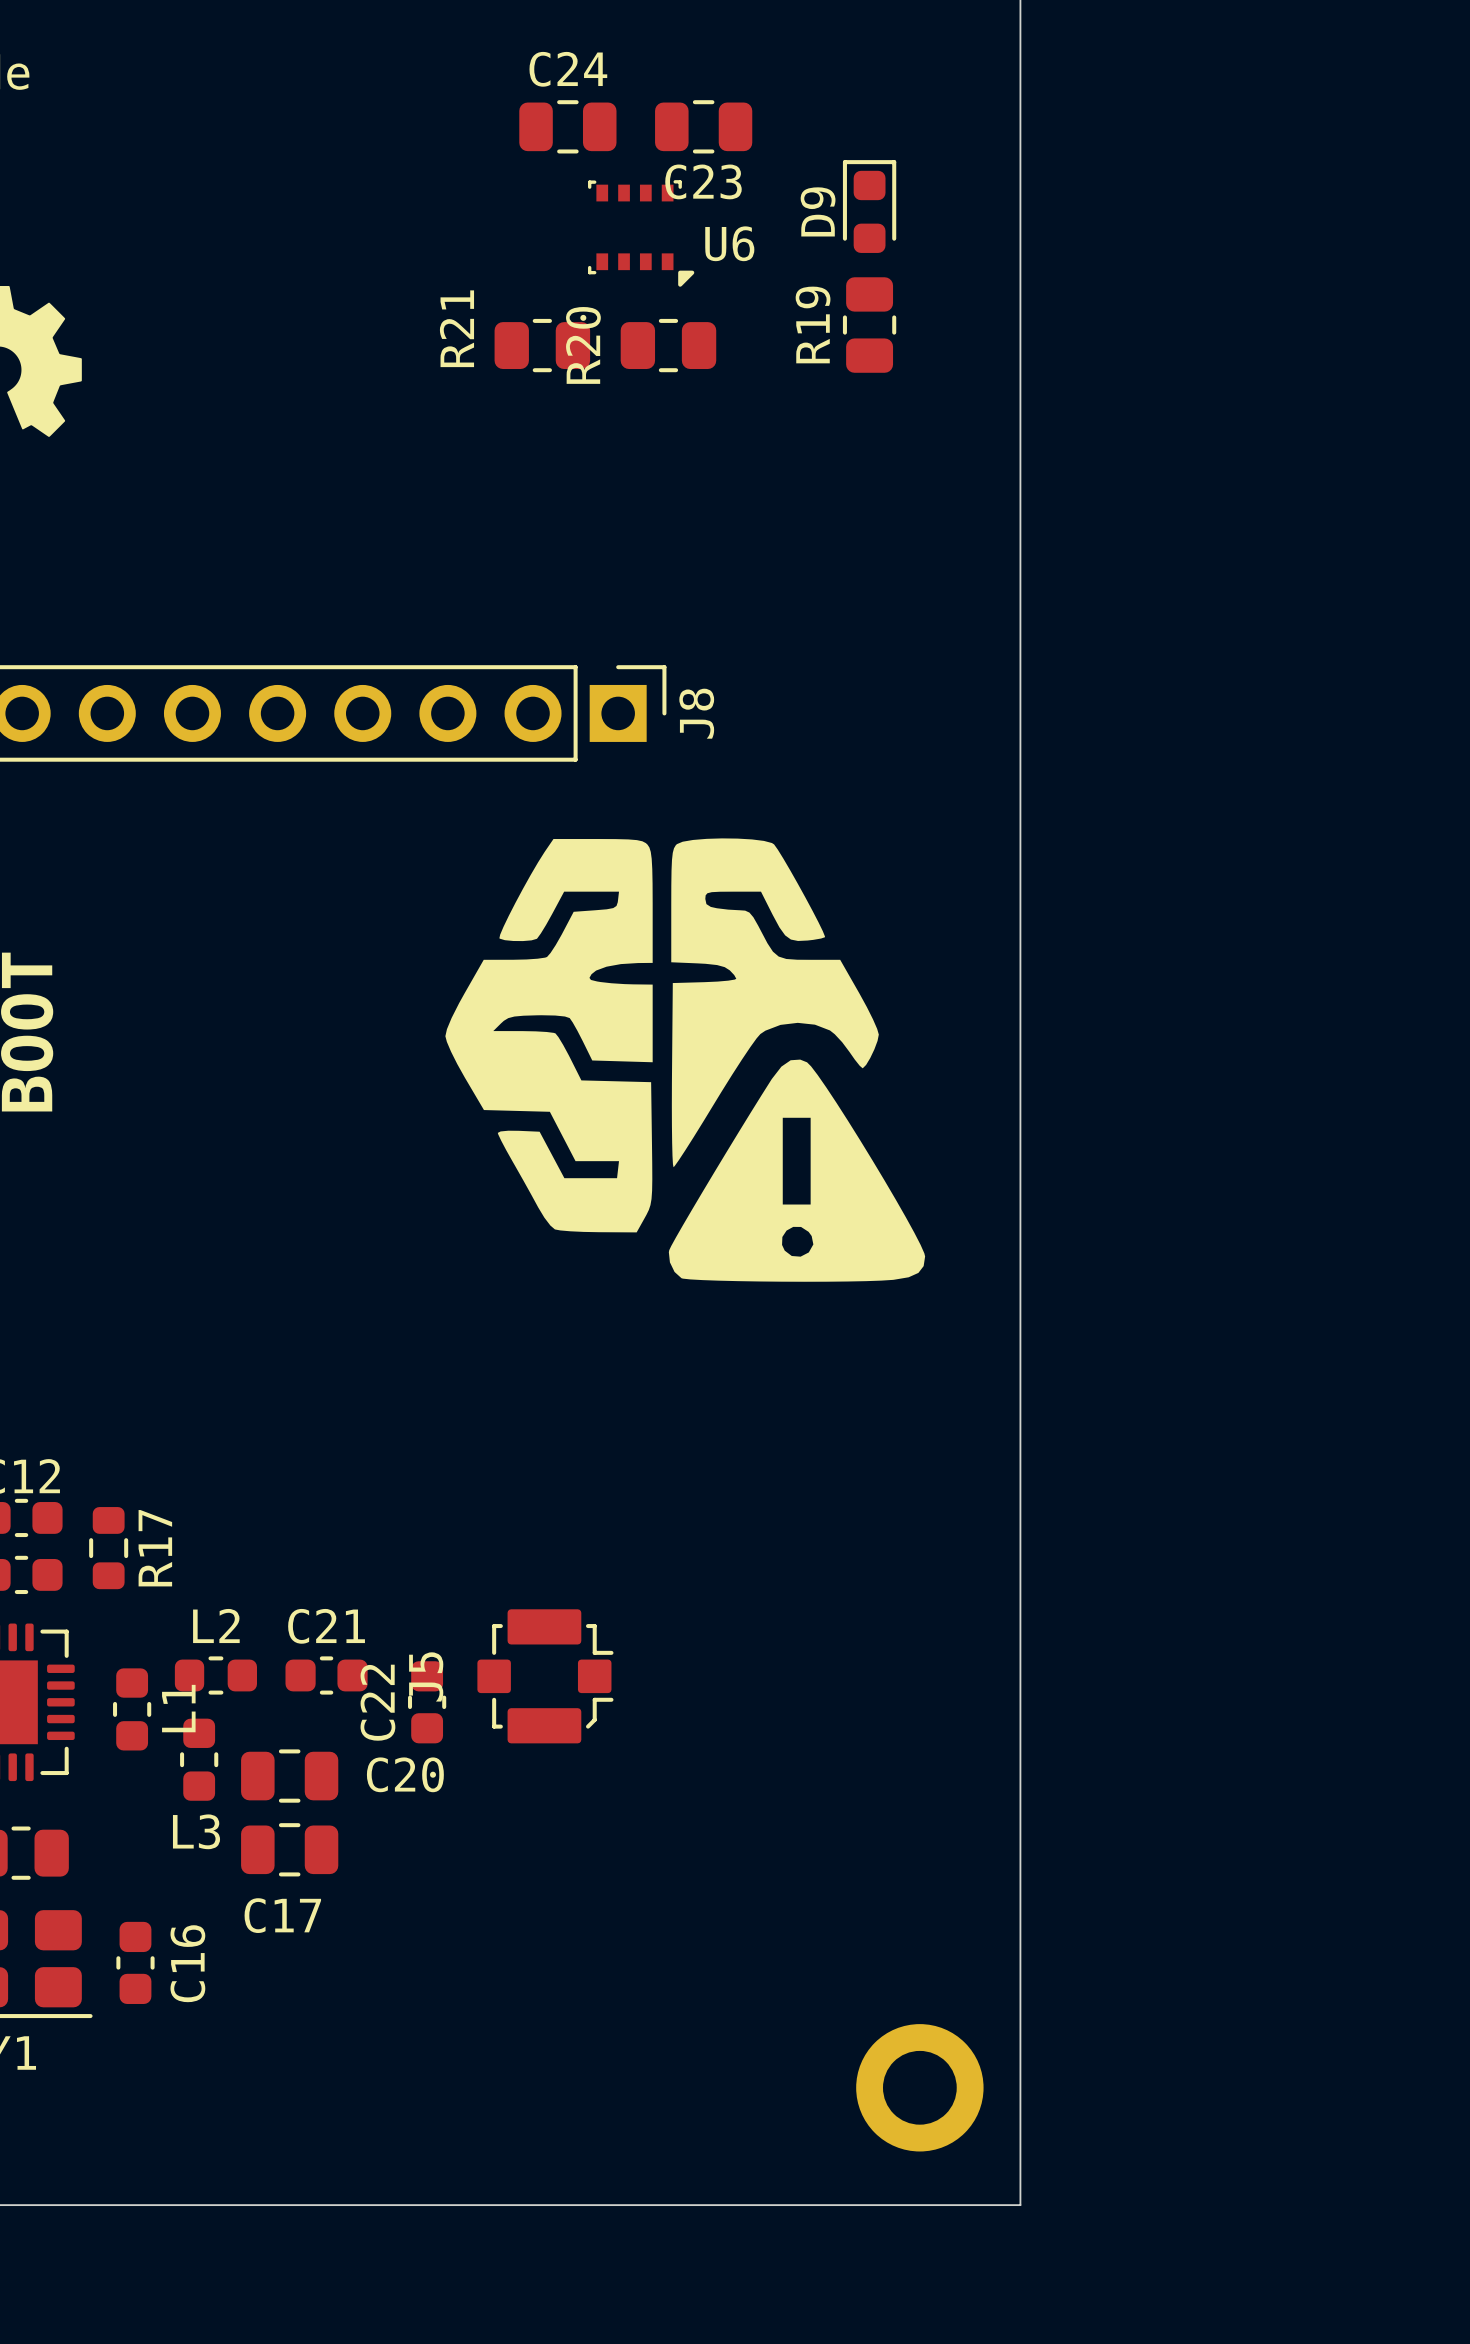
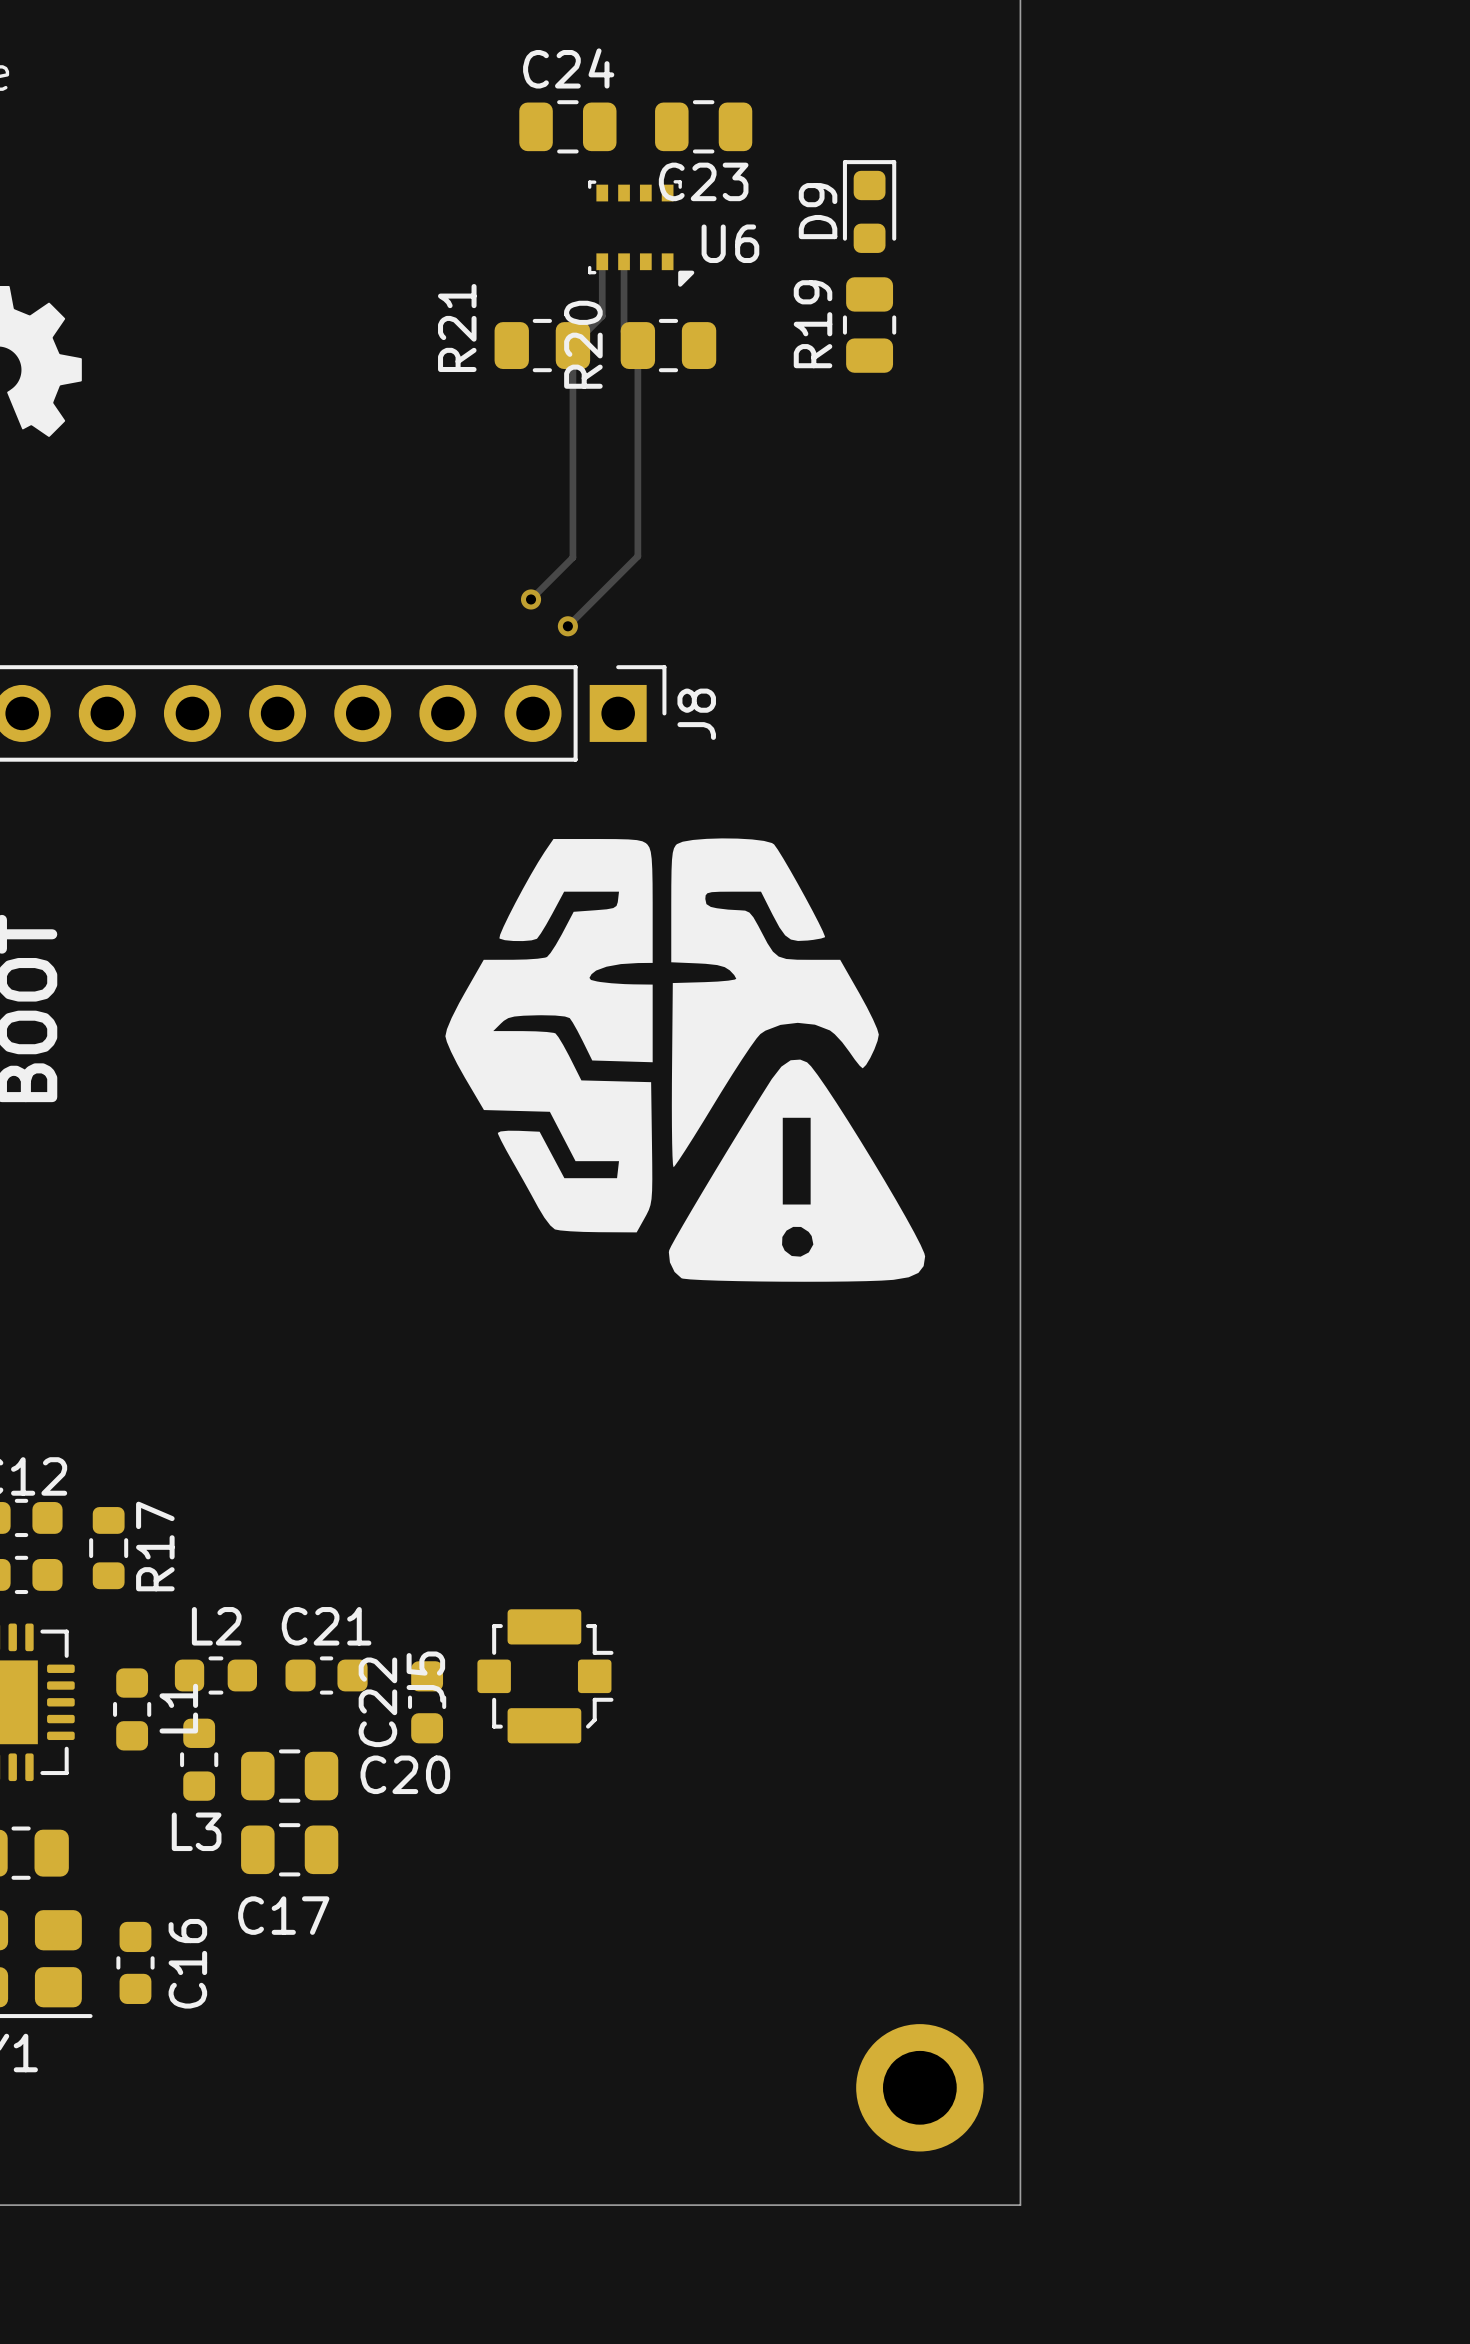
track: none -> (602, 261) (602, 316) (572, 345) (572, 557) (531, 599)
track: none -> (624, 261) (624, 331) (637, 345) (637, 556) (567, 626)
via: none -> (531, 599)
via: none -> (567, 626)

